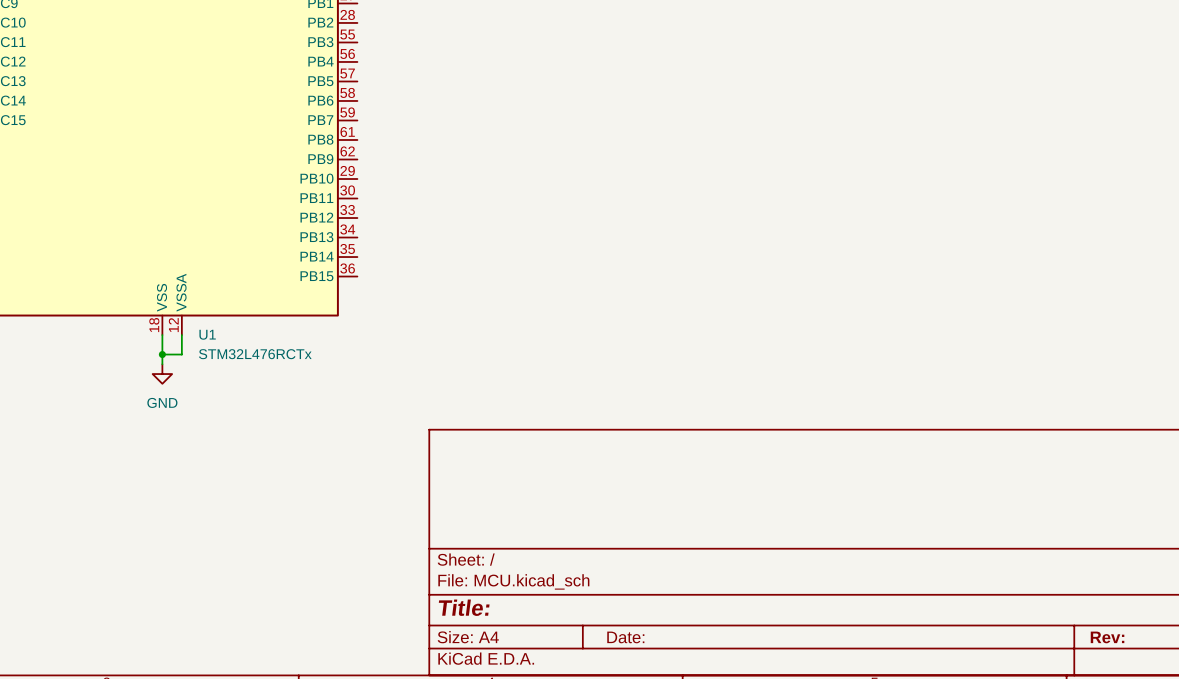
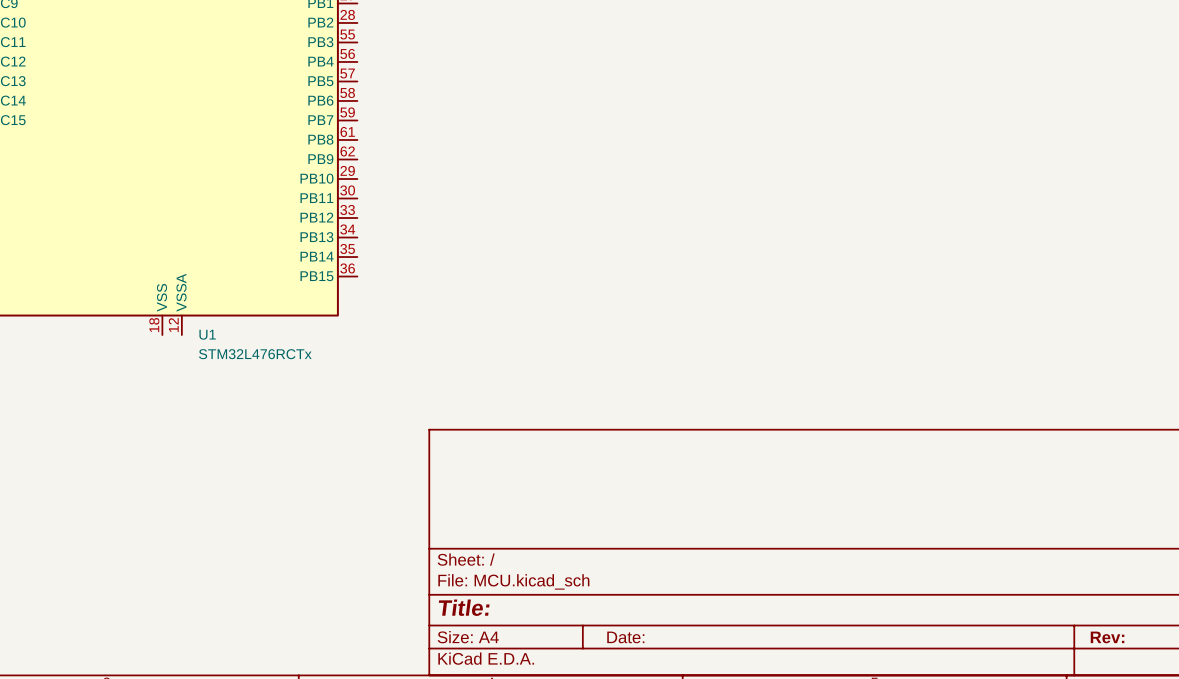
wire: (162, 335) (162, 364) -> none
wire: (181, 335) (181, 354) (162, 354) -> none
junction: (162, 354) -> none
power symbol: GND (162, 374) -> none

